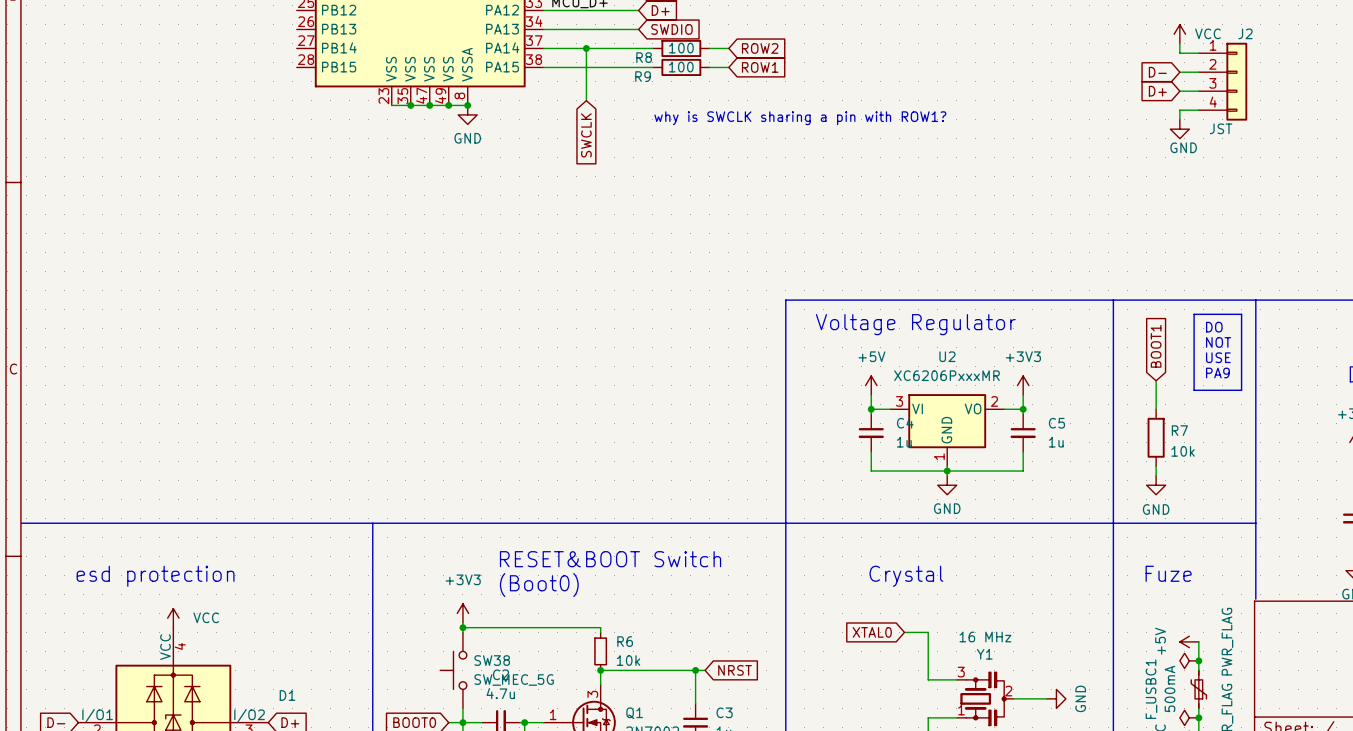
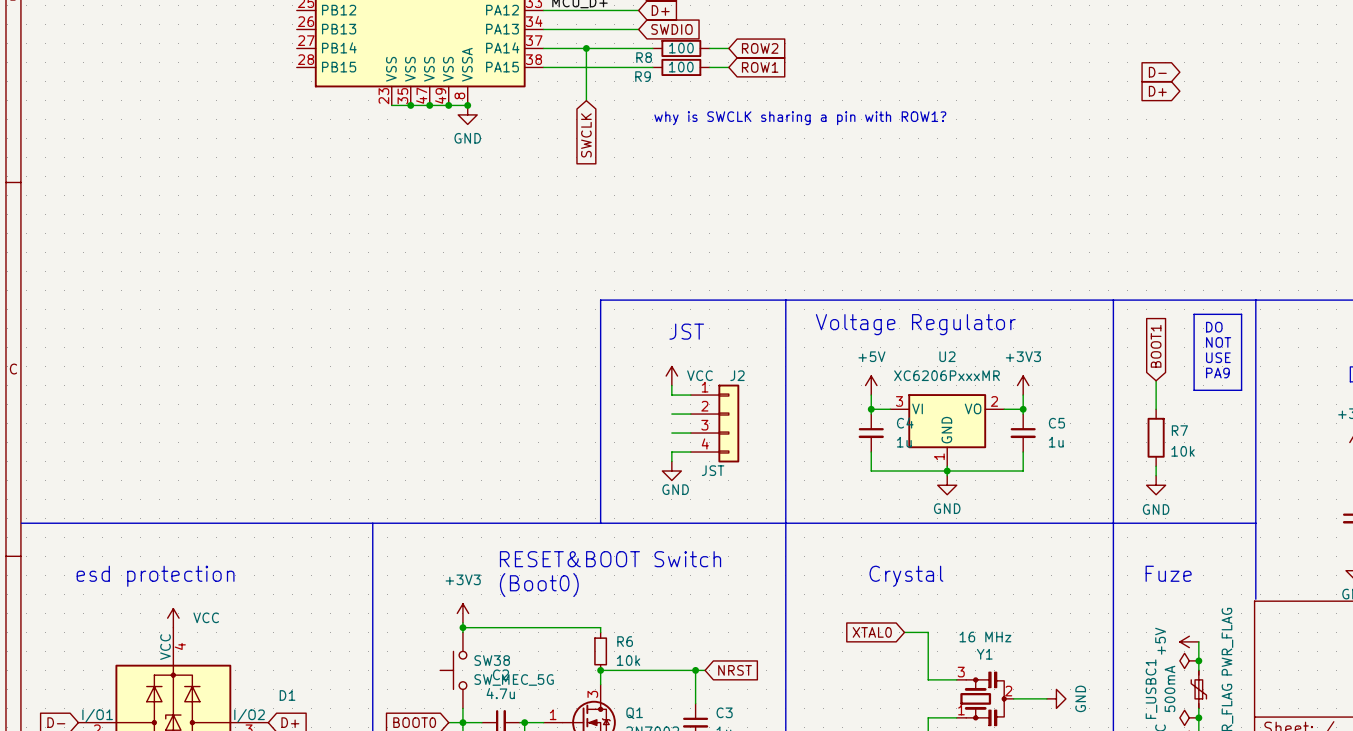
power symbol: VCC (1179, 34) -> none
wire: (1179, 43) (1179, 53) (1198, 53) -> none
wire: (1179, 72) (1198, 72) -> none
J2 position: (1223, 81) -> (715, 423)
wire: (1179, 91) (1198, 91) -> none
wire: (1198, 110) (1179, 110) (1179, 119) -> none
power symbol: GND (1179, 129) -> none
line: none -> (785, 300) (600, 300) (600, 523)
text: none -> JST (686, 331)
power symbol: none -> VCC (671, 376)
wire: none -> (671, 385) (671, 395) (690, 395)
wire: none -> (671, 414) (690, 414)
wire: none -> (671, 433) (690, 433)
wire: none -> (690, 452) (671, 452) (671, 461)
power symbol: none -> GND (671, 471)

